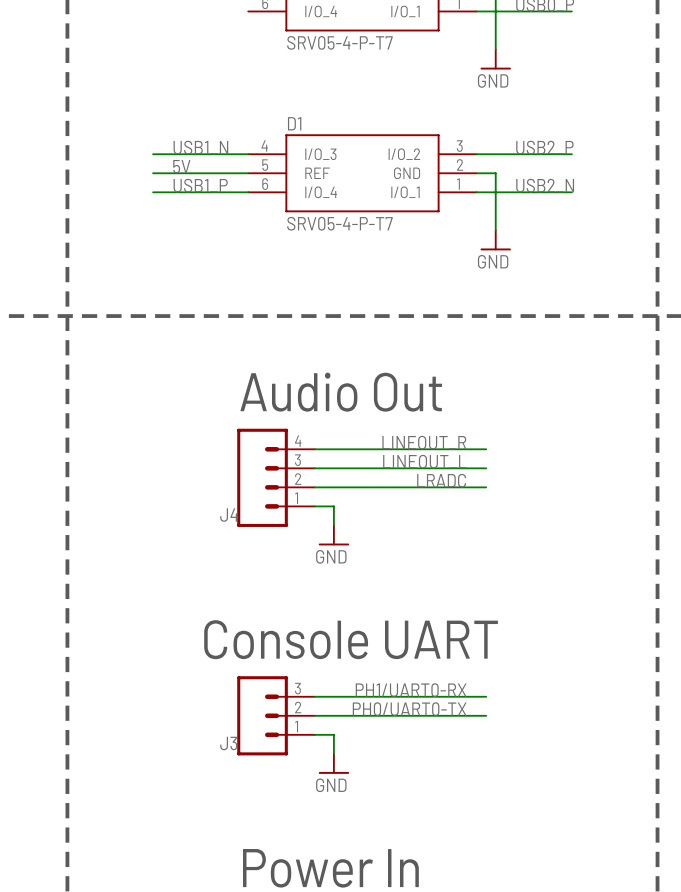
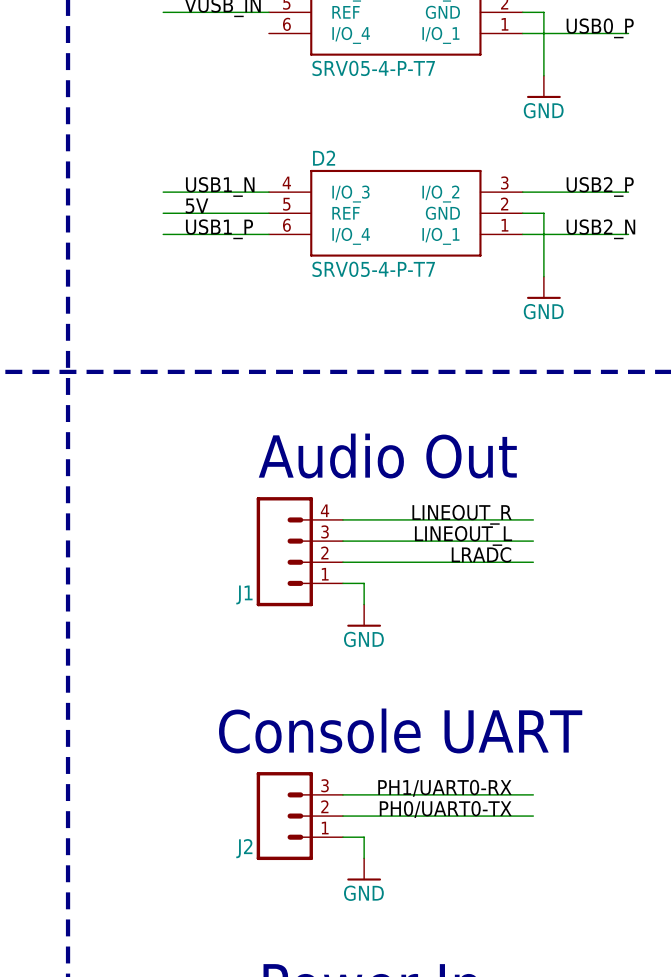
D1 name: D1 (294, 123) -> D2 (324, 158)
J4 name: J4 (229, 515) -> J1 (244, 594)
J3 name: J3 (228, 743) -> J2 (244, 848)

